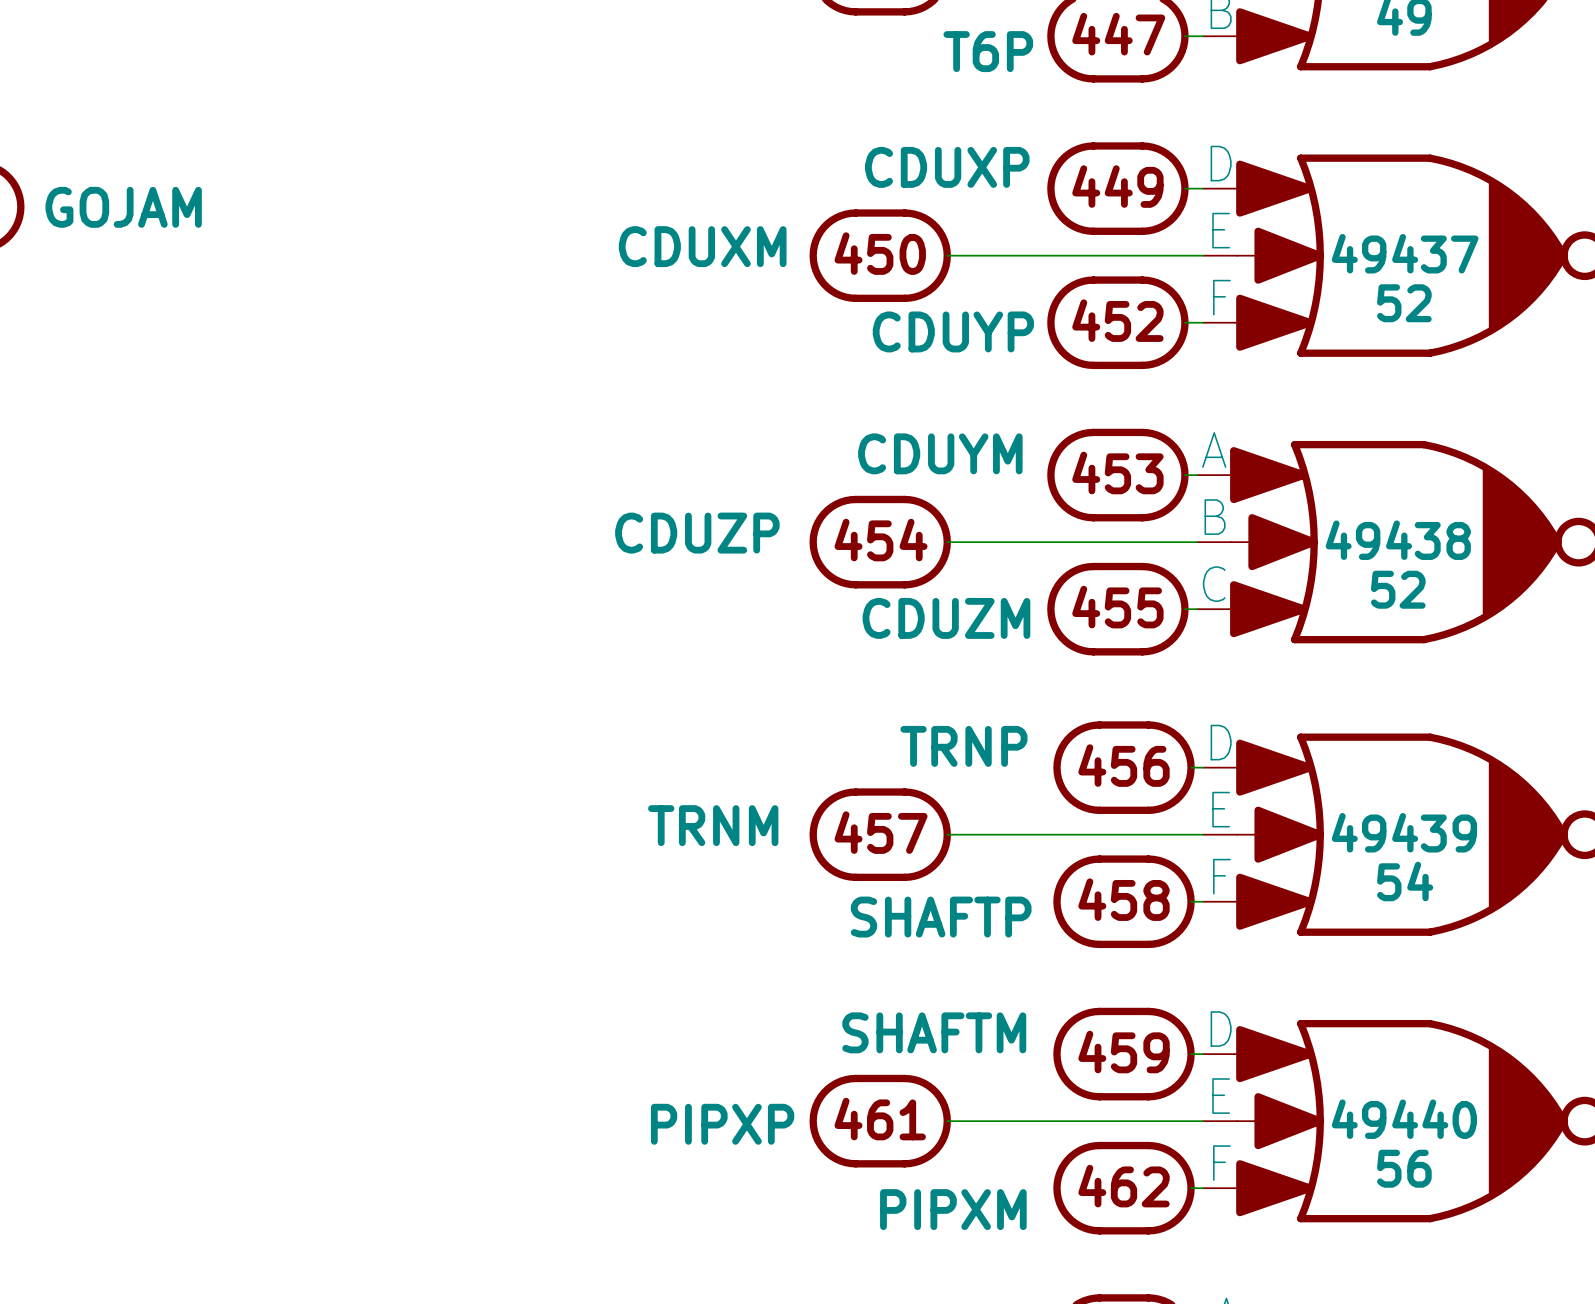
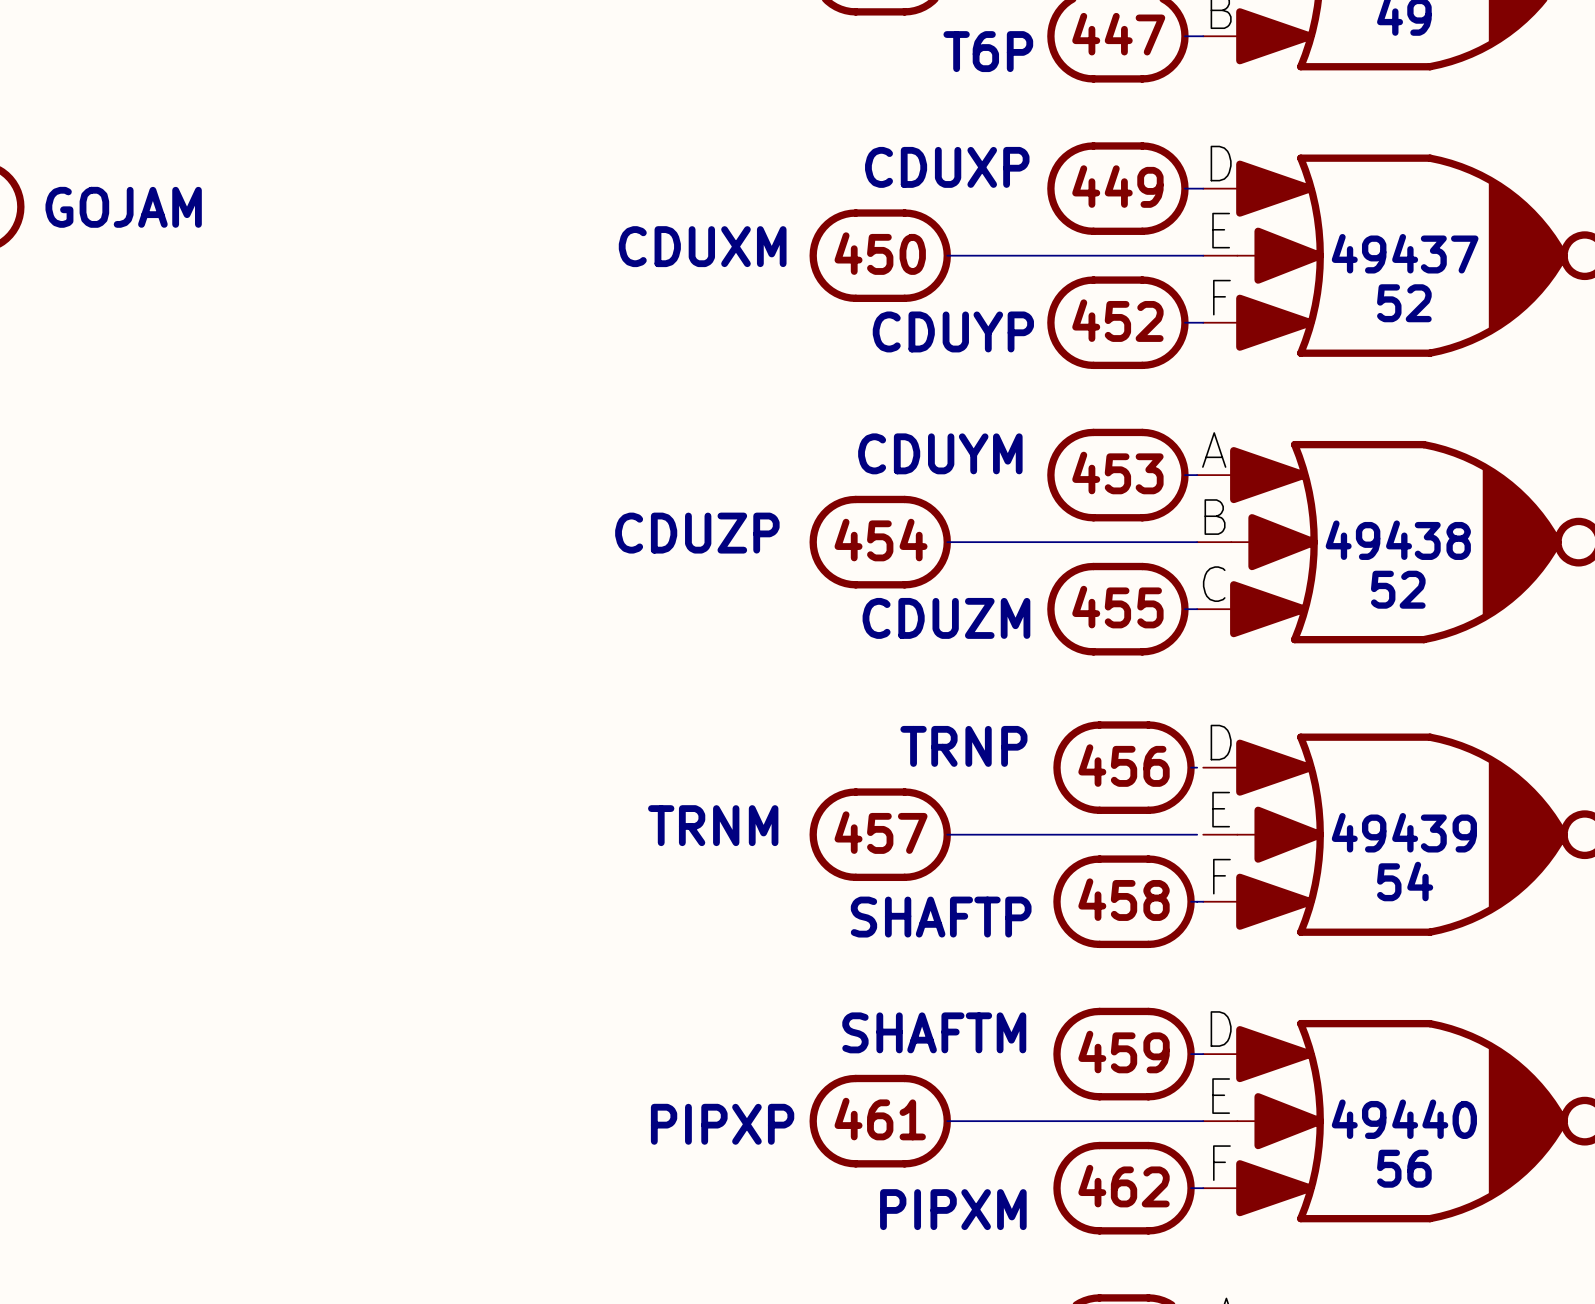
wire: (1197, 767) (1203, 767) -> none
wire: (1197, 834) (1203, 834) -> none

